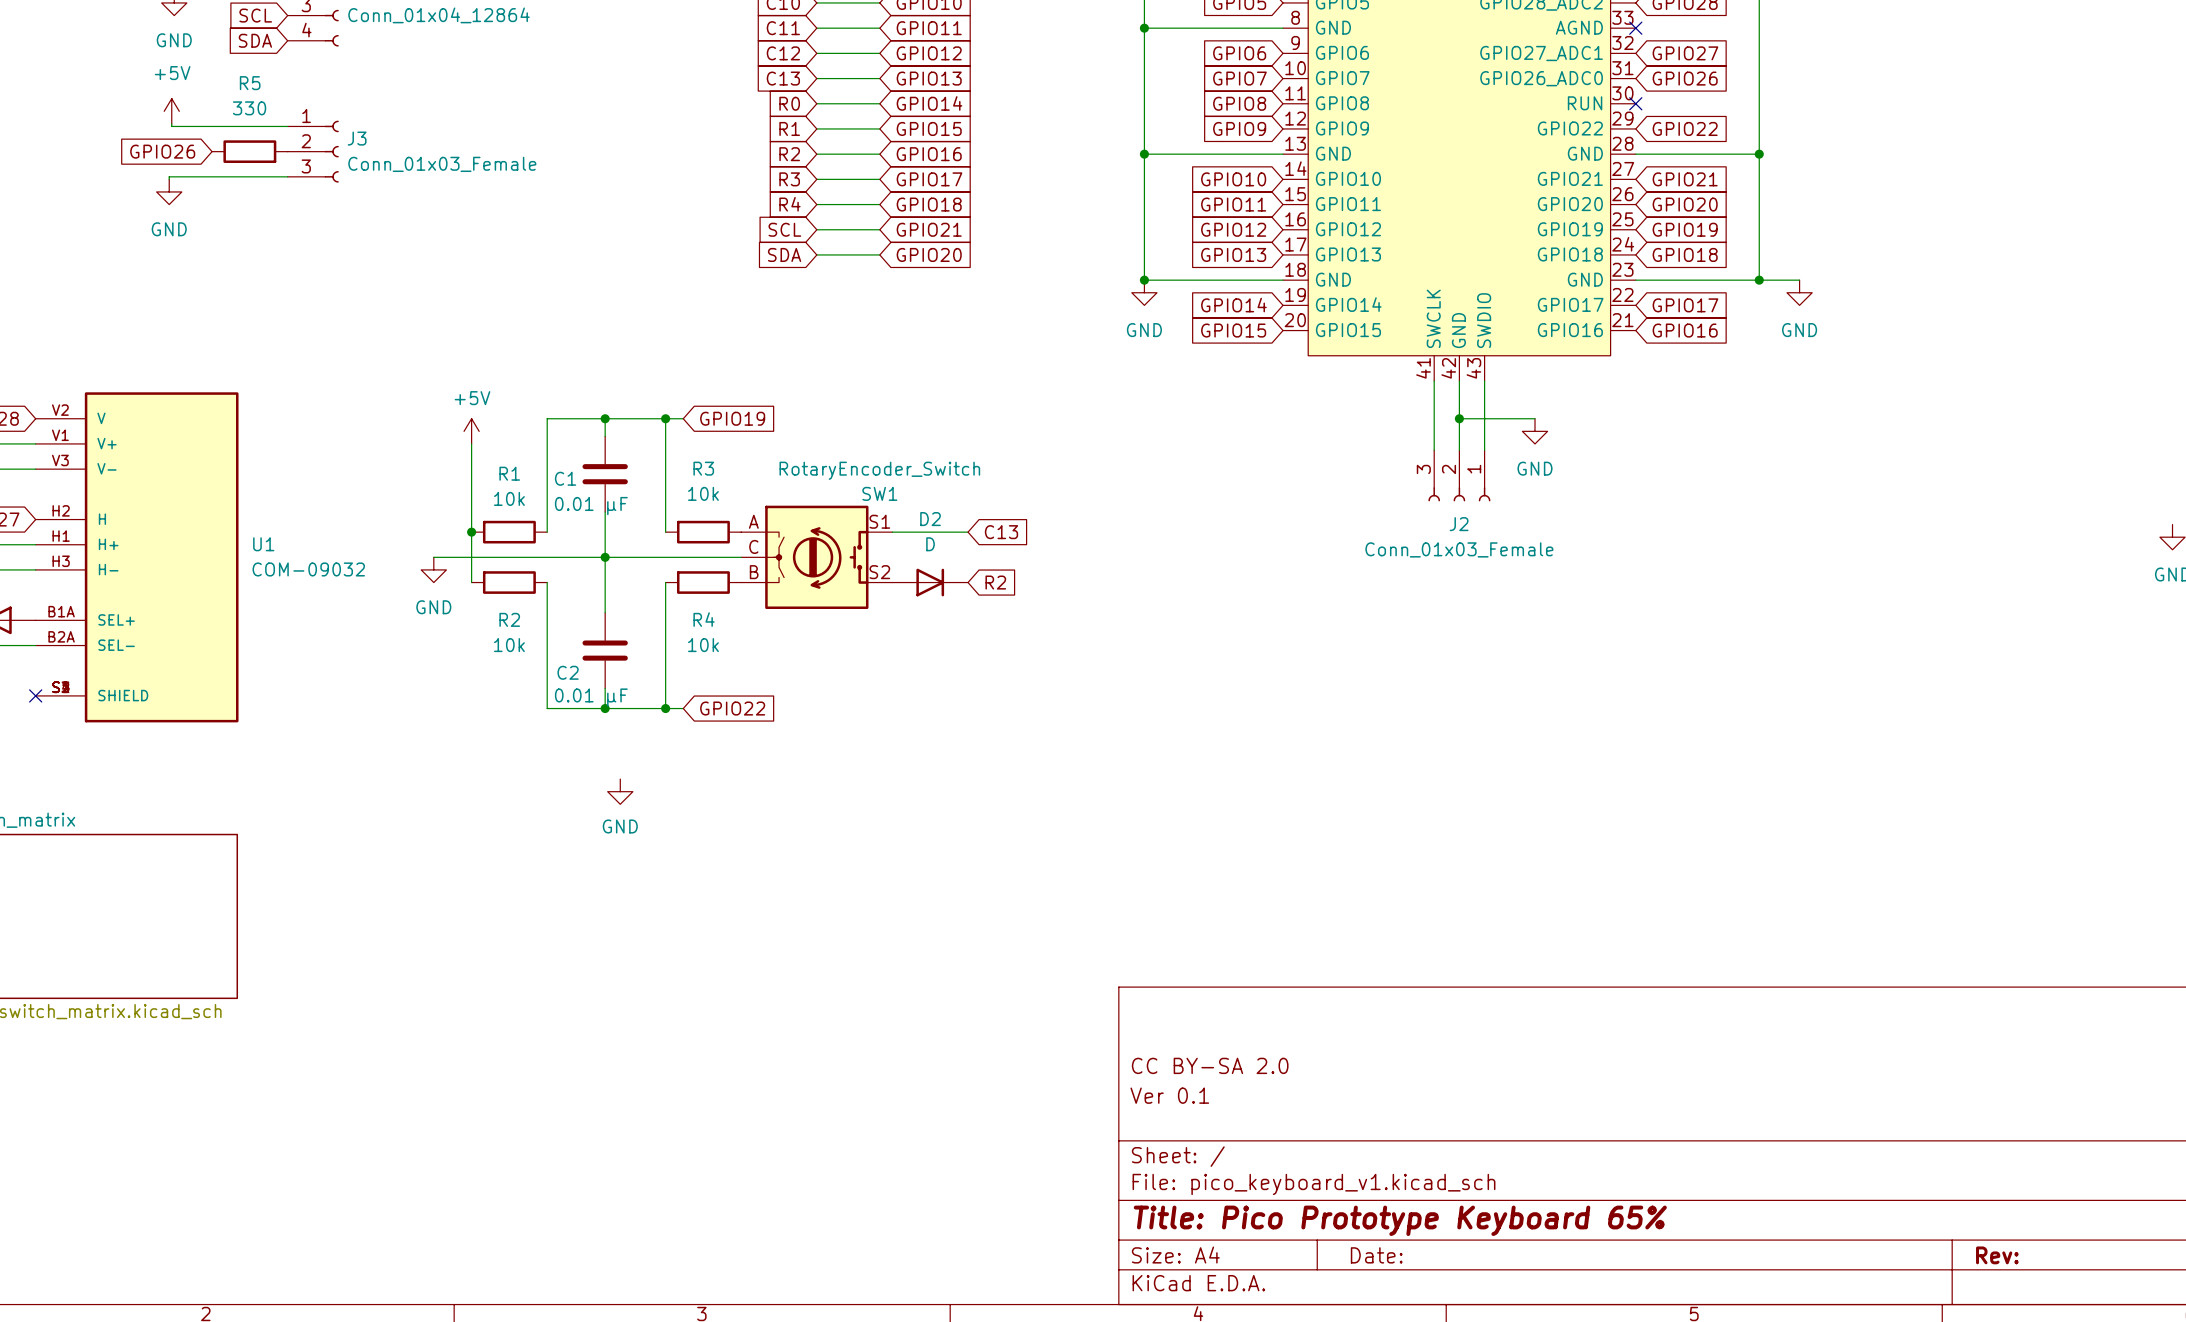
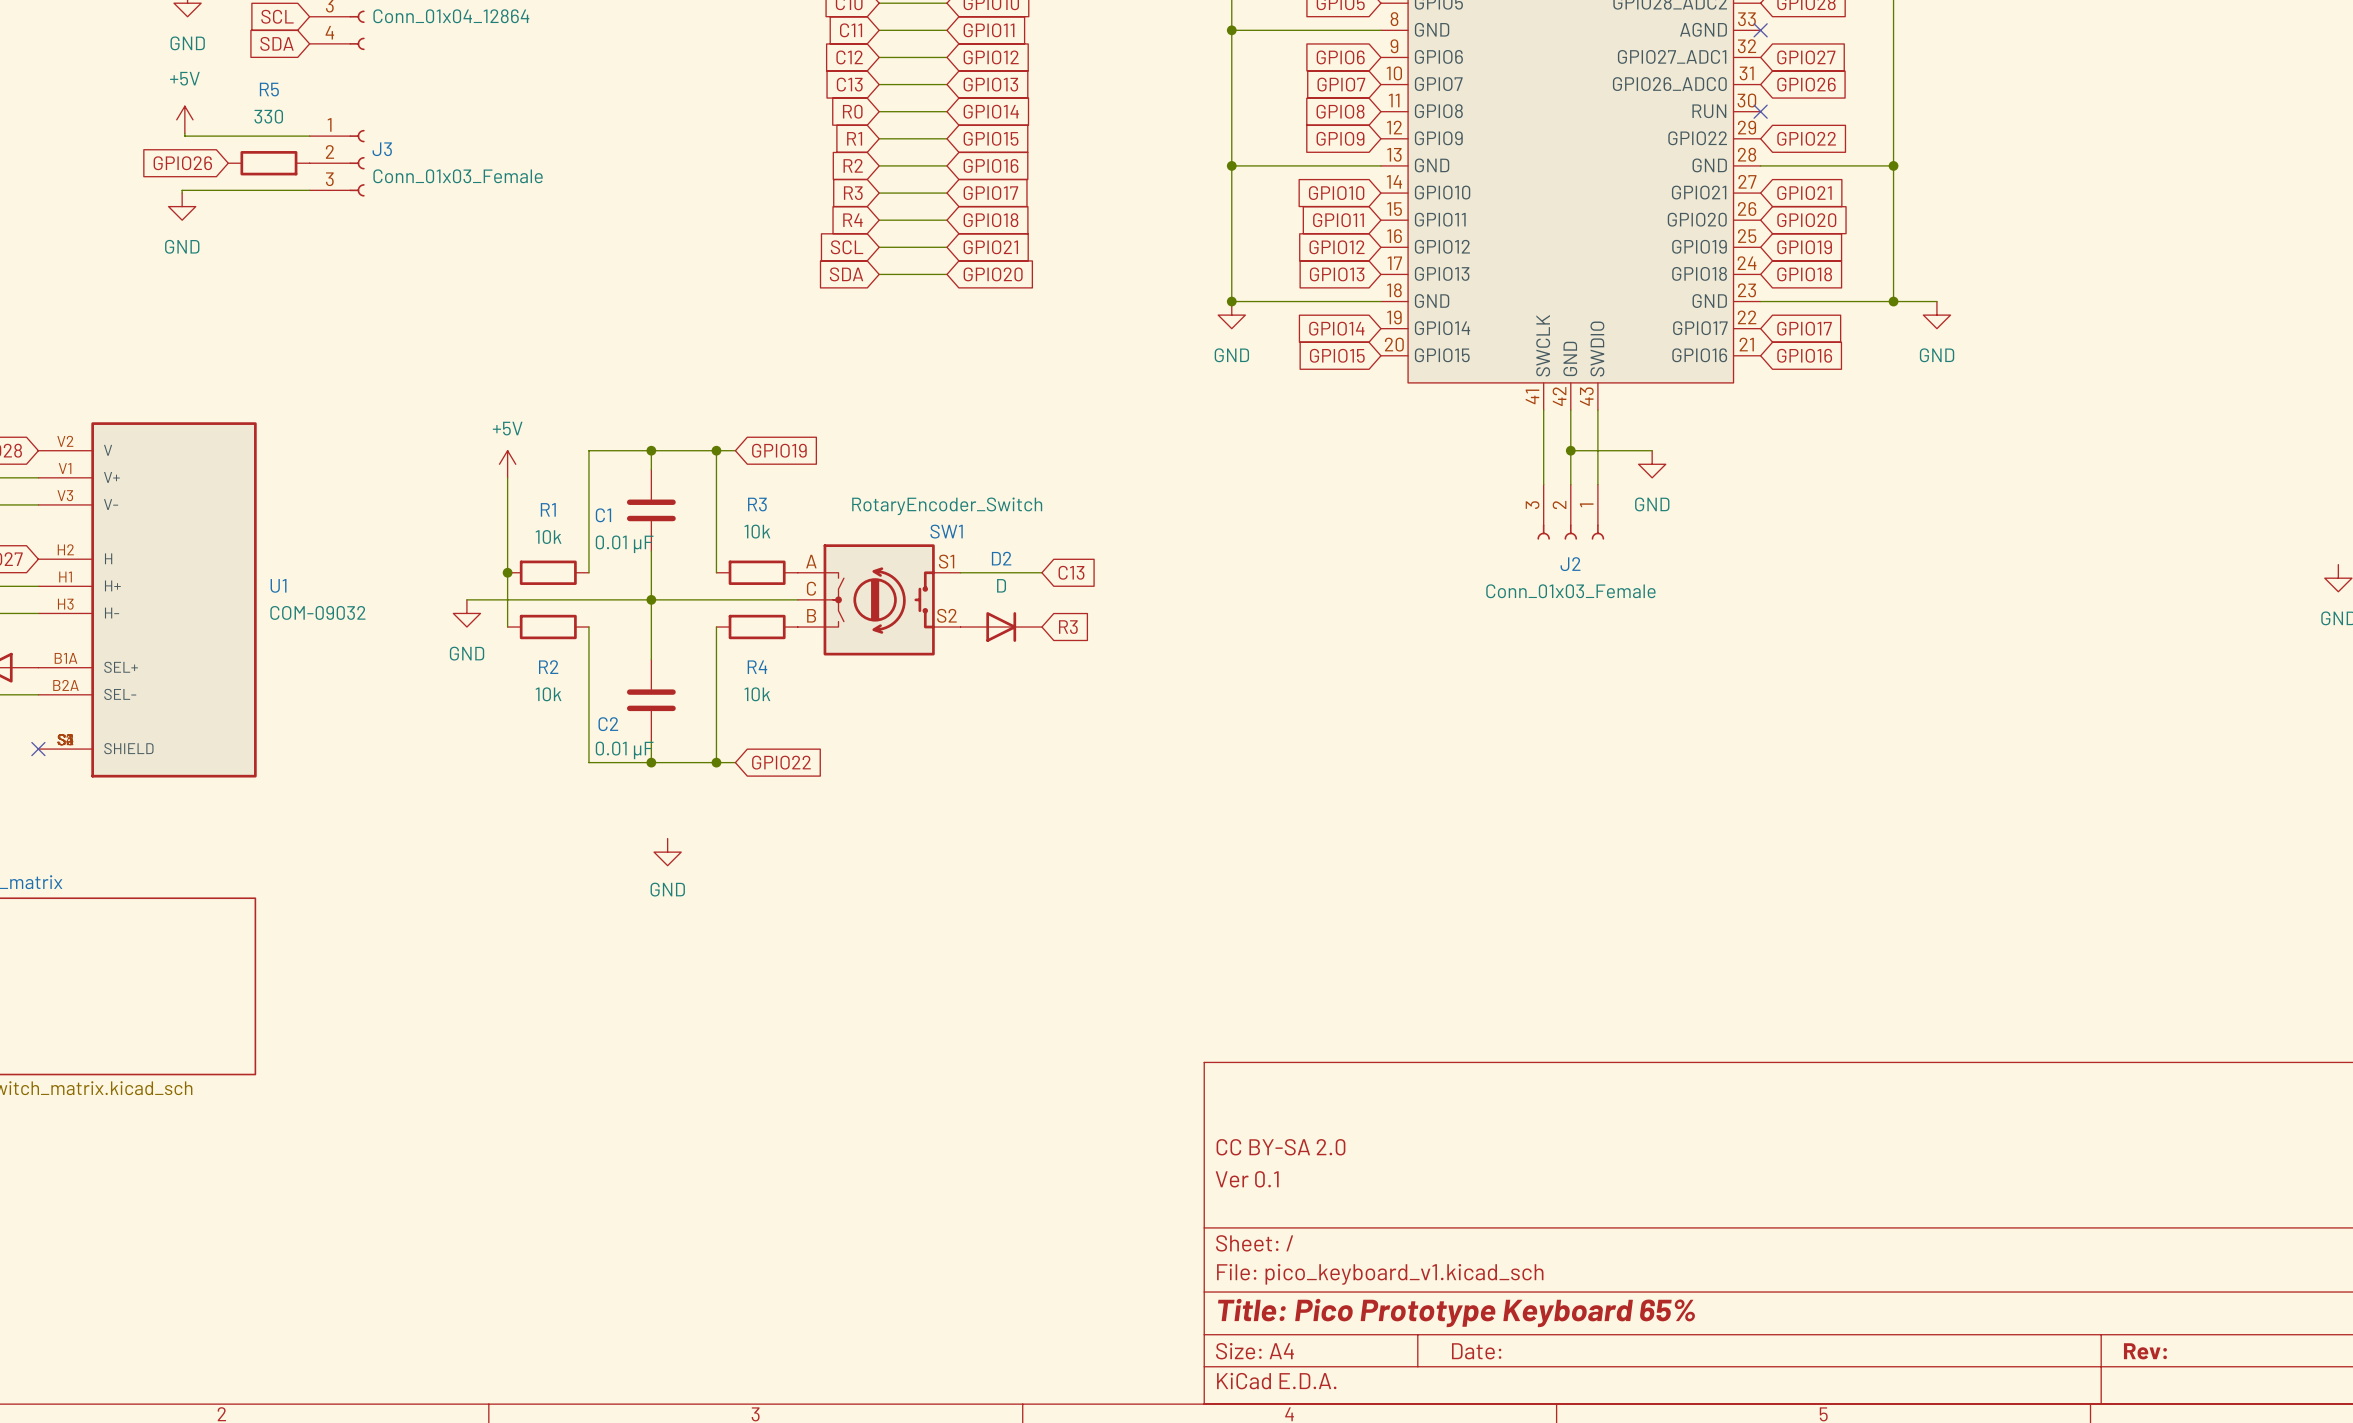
global label: R2 (995, 582) -> R3 (1068, 627)

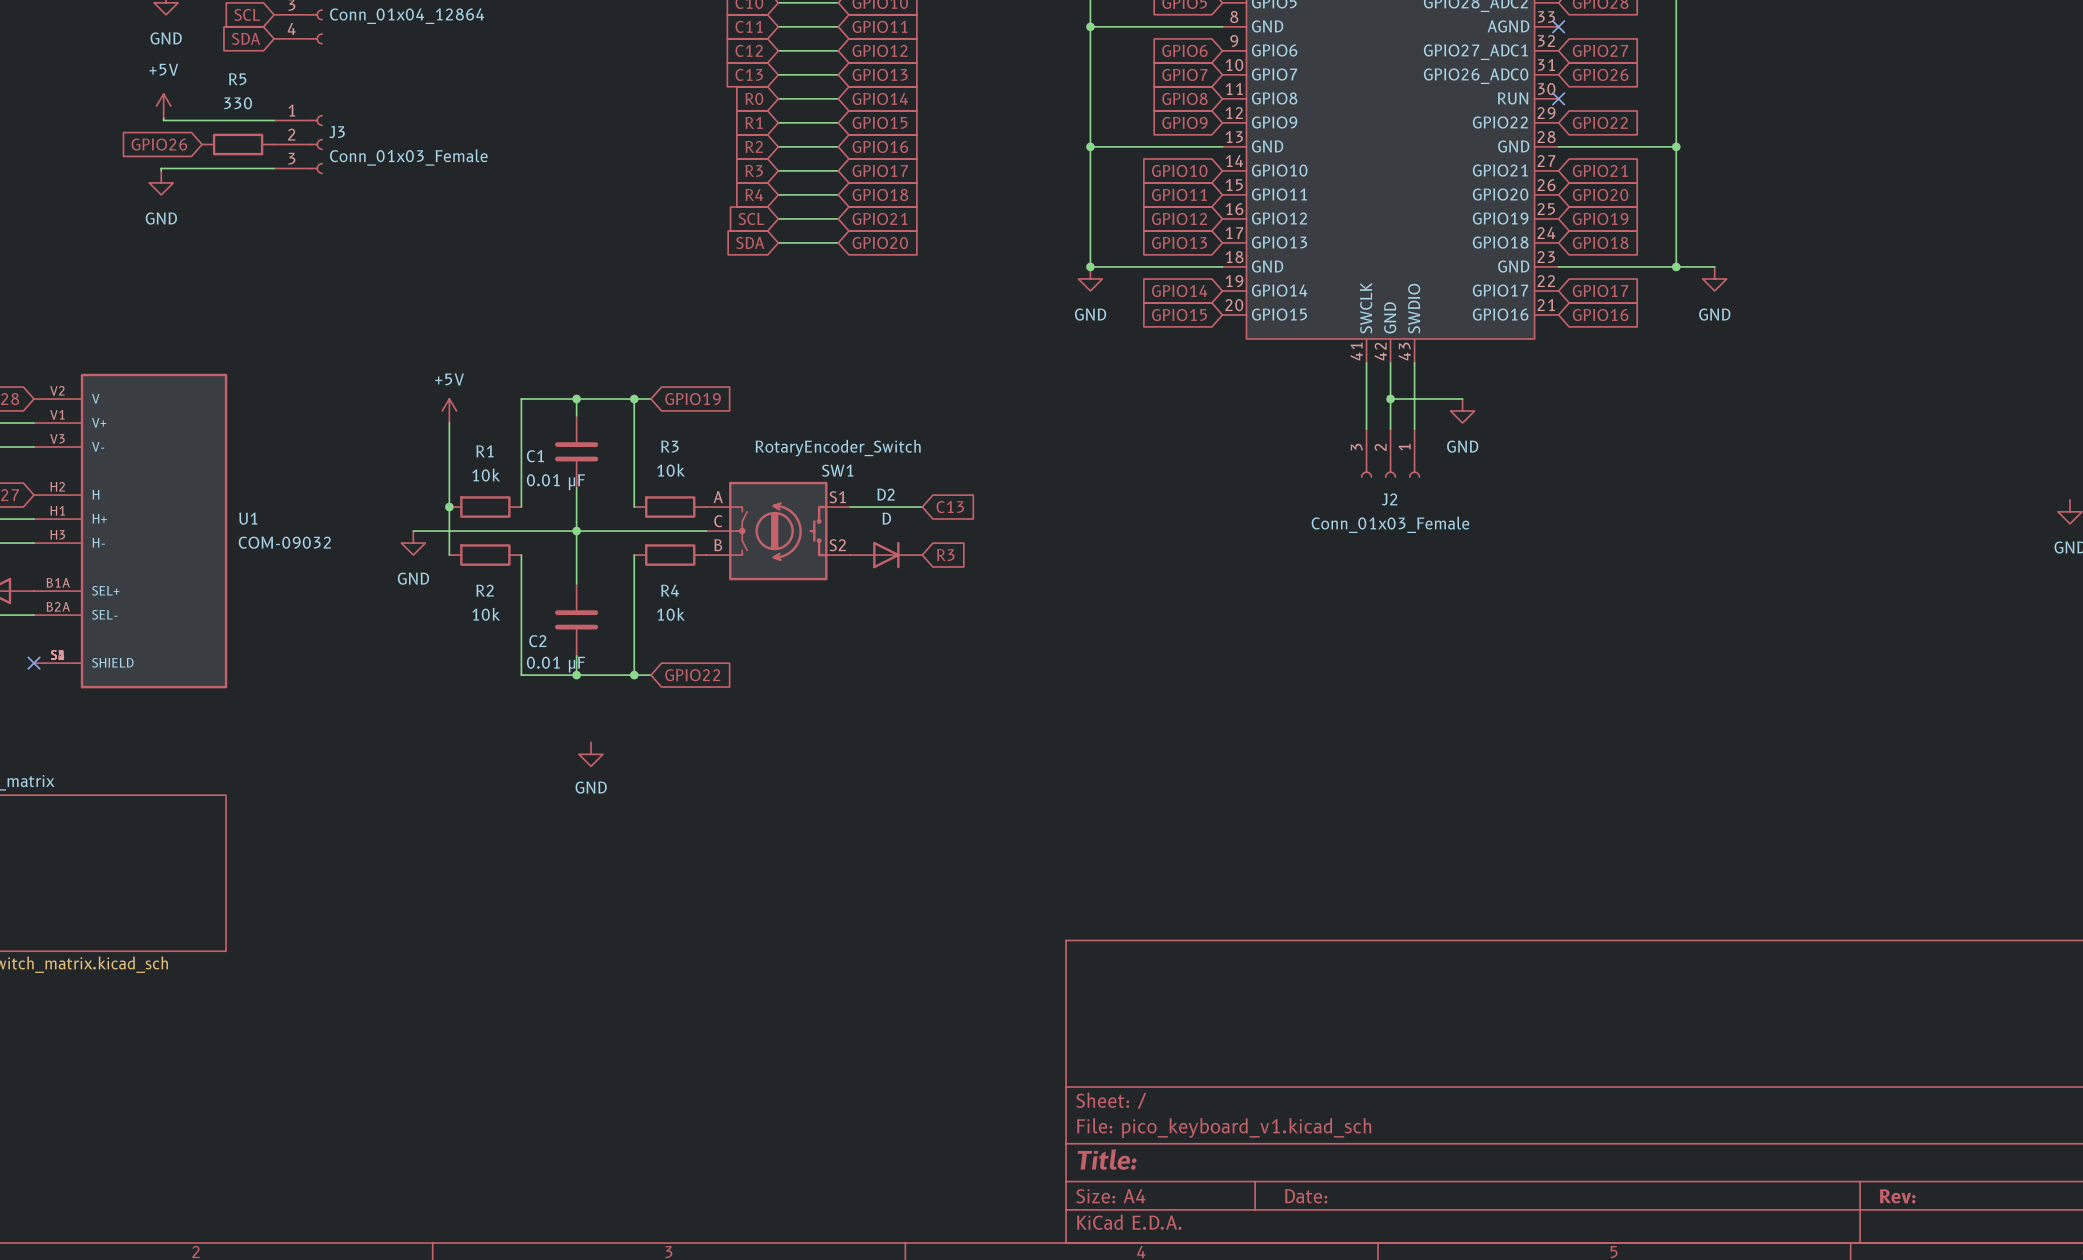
title block: CC BY-SA 2.0 (1280, 1147) -> none
title block: Ver 0.1 (1247, 1179) -> none
title block: Title: Pico Prototype Keyboard 65% (1456, 1313) -> Title: (1107, 1159)

